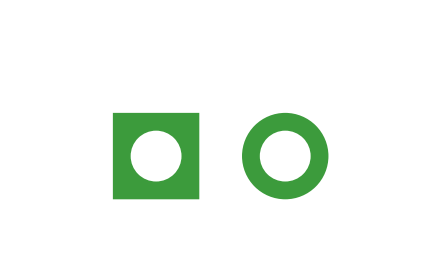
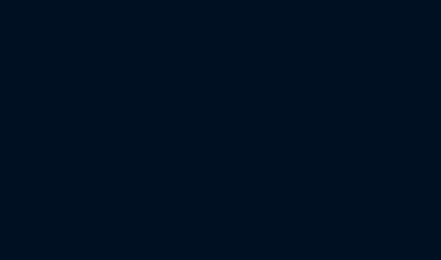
part: (220, 156) -> none

